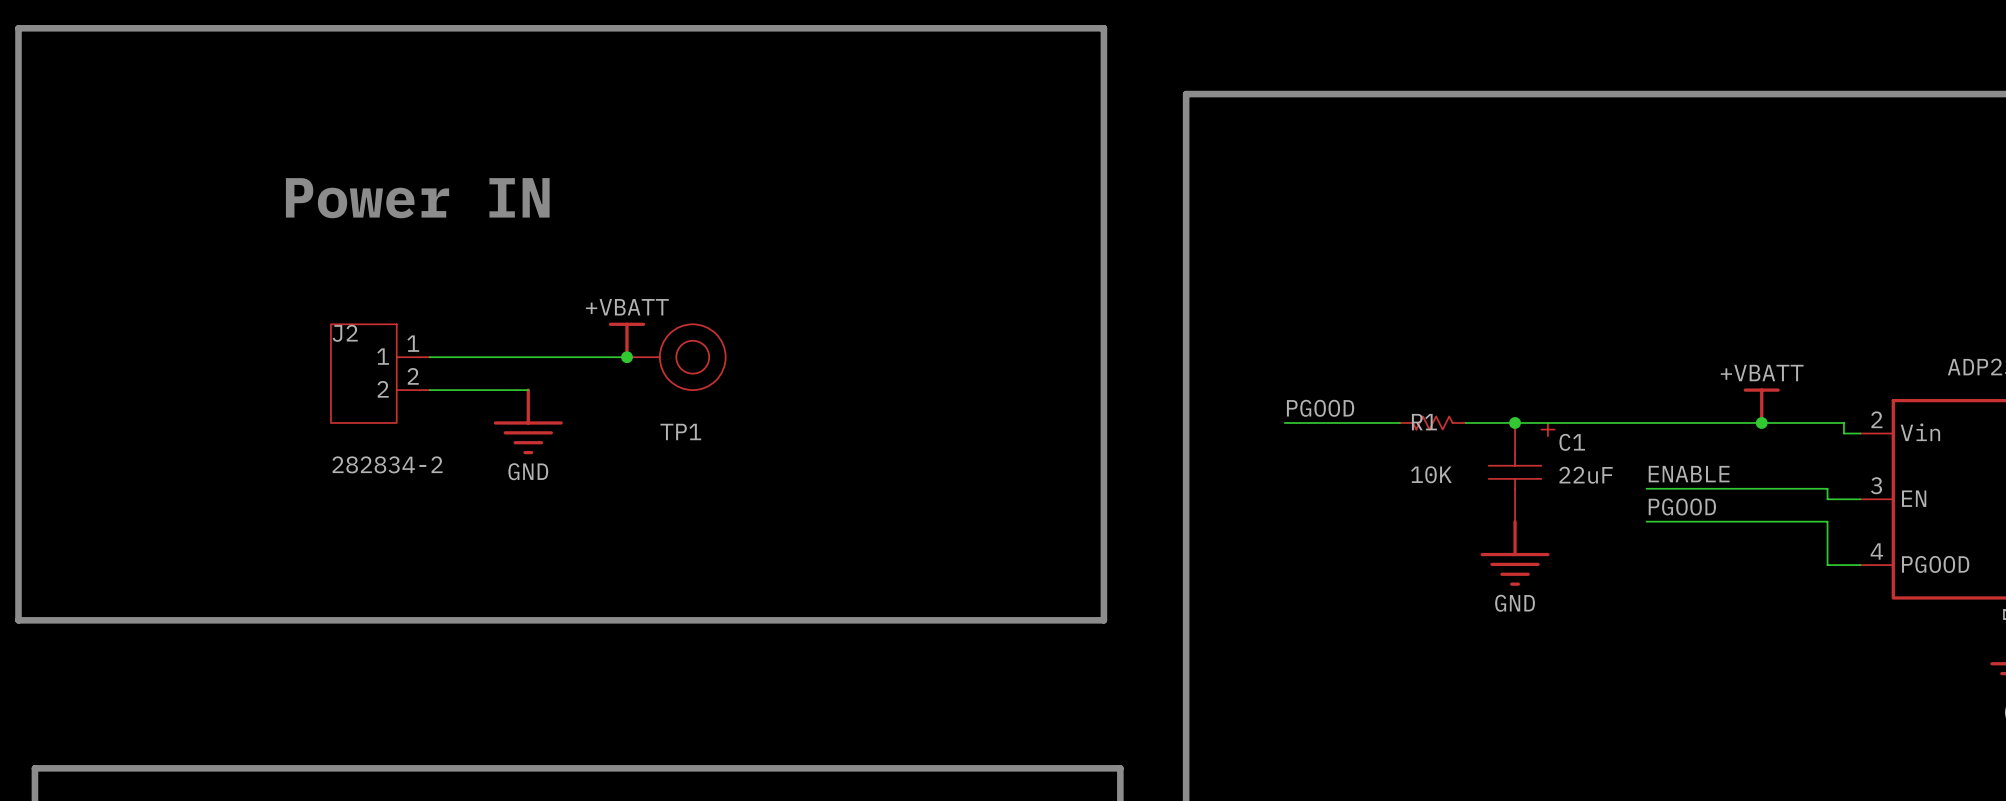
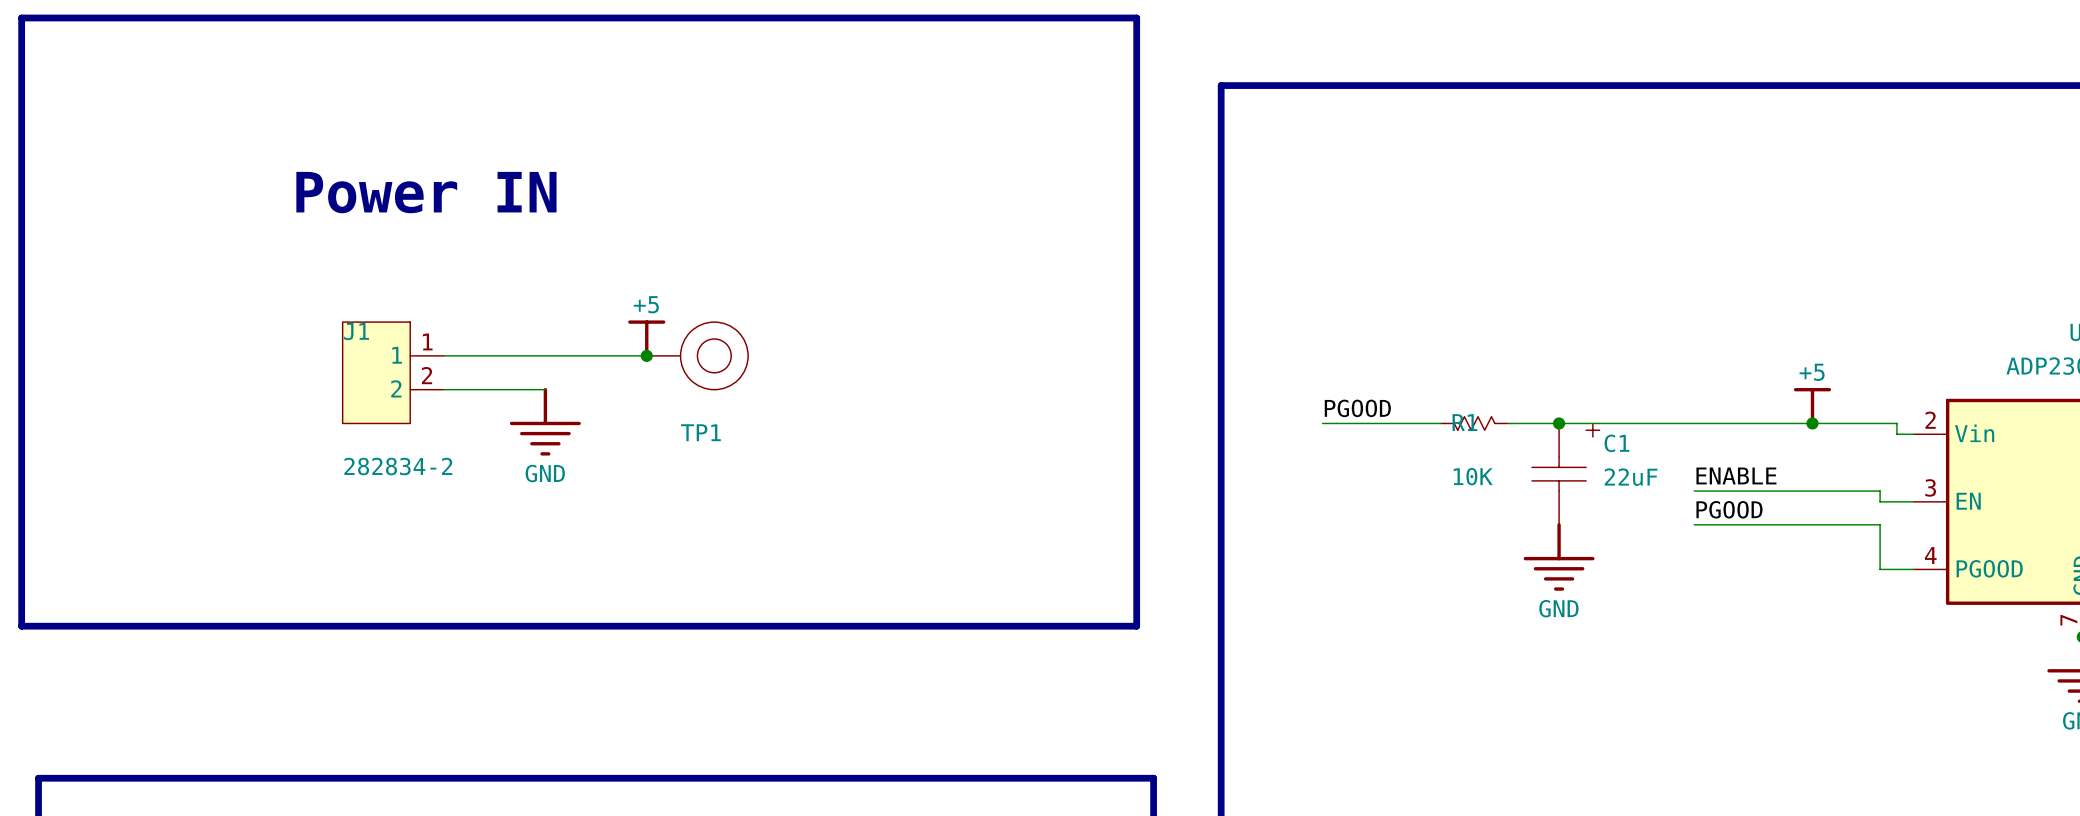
J2 name: J2 (345, 333) -> J1 (356, 331)
power symbol: +VBATT (626, 340) -> +5 (646, 338)
power symbol: +VBATT (1761, 406) -> +5 (1812, 406)

